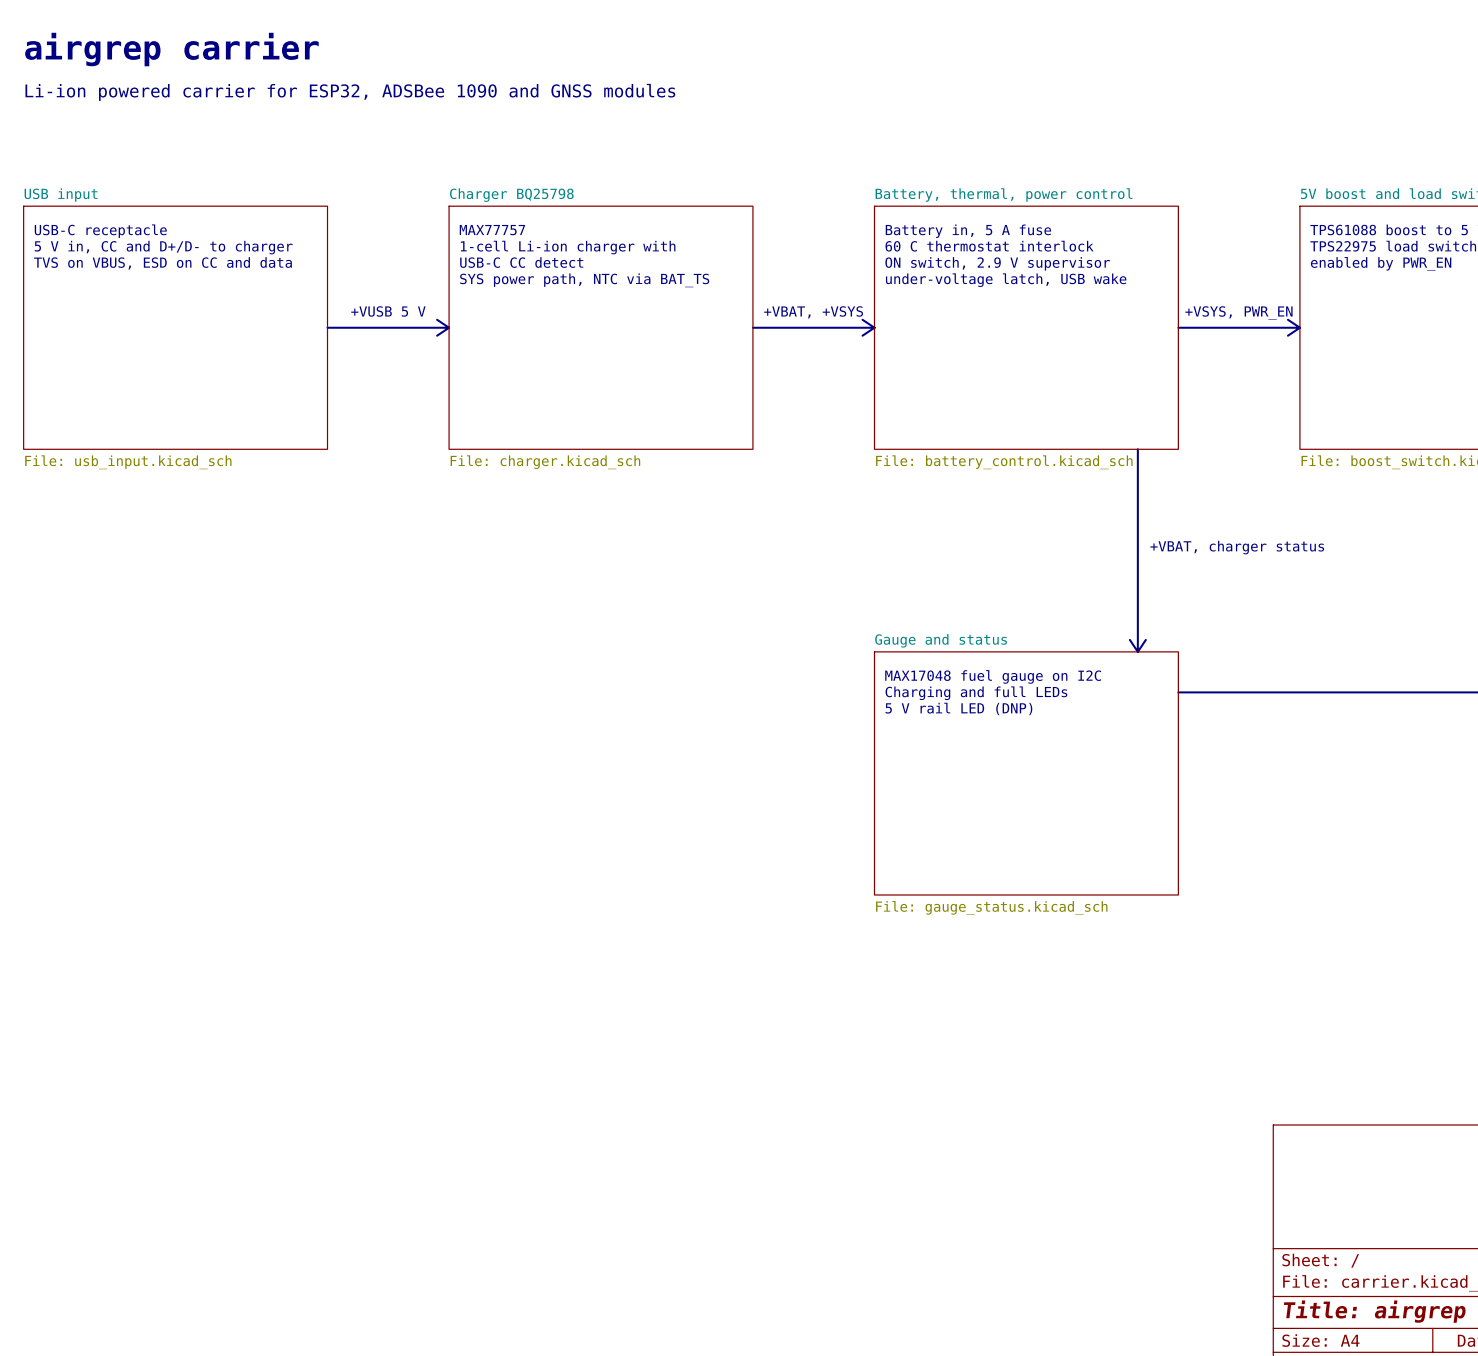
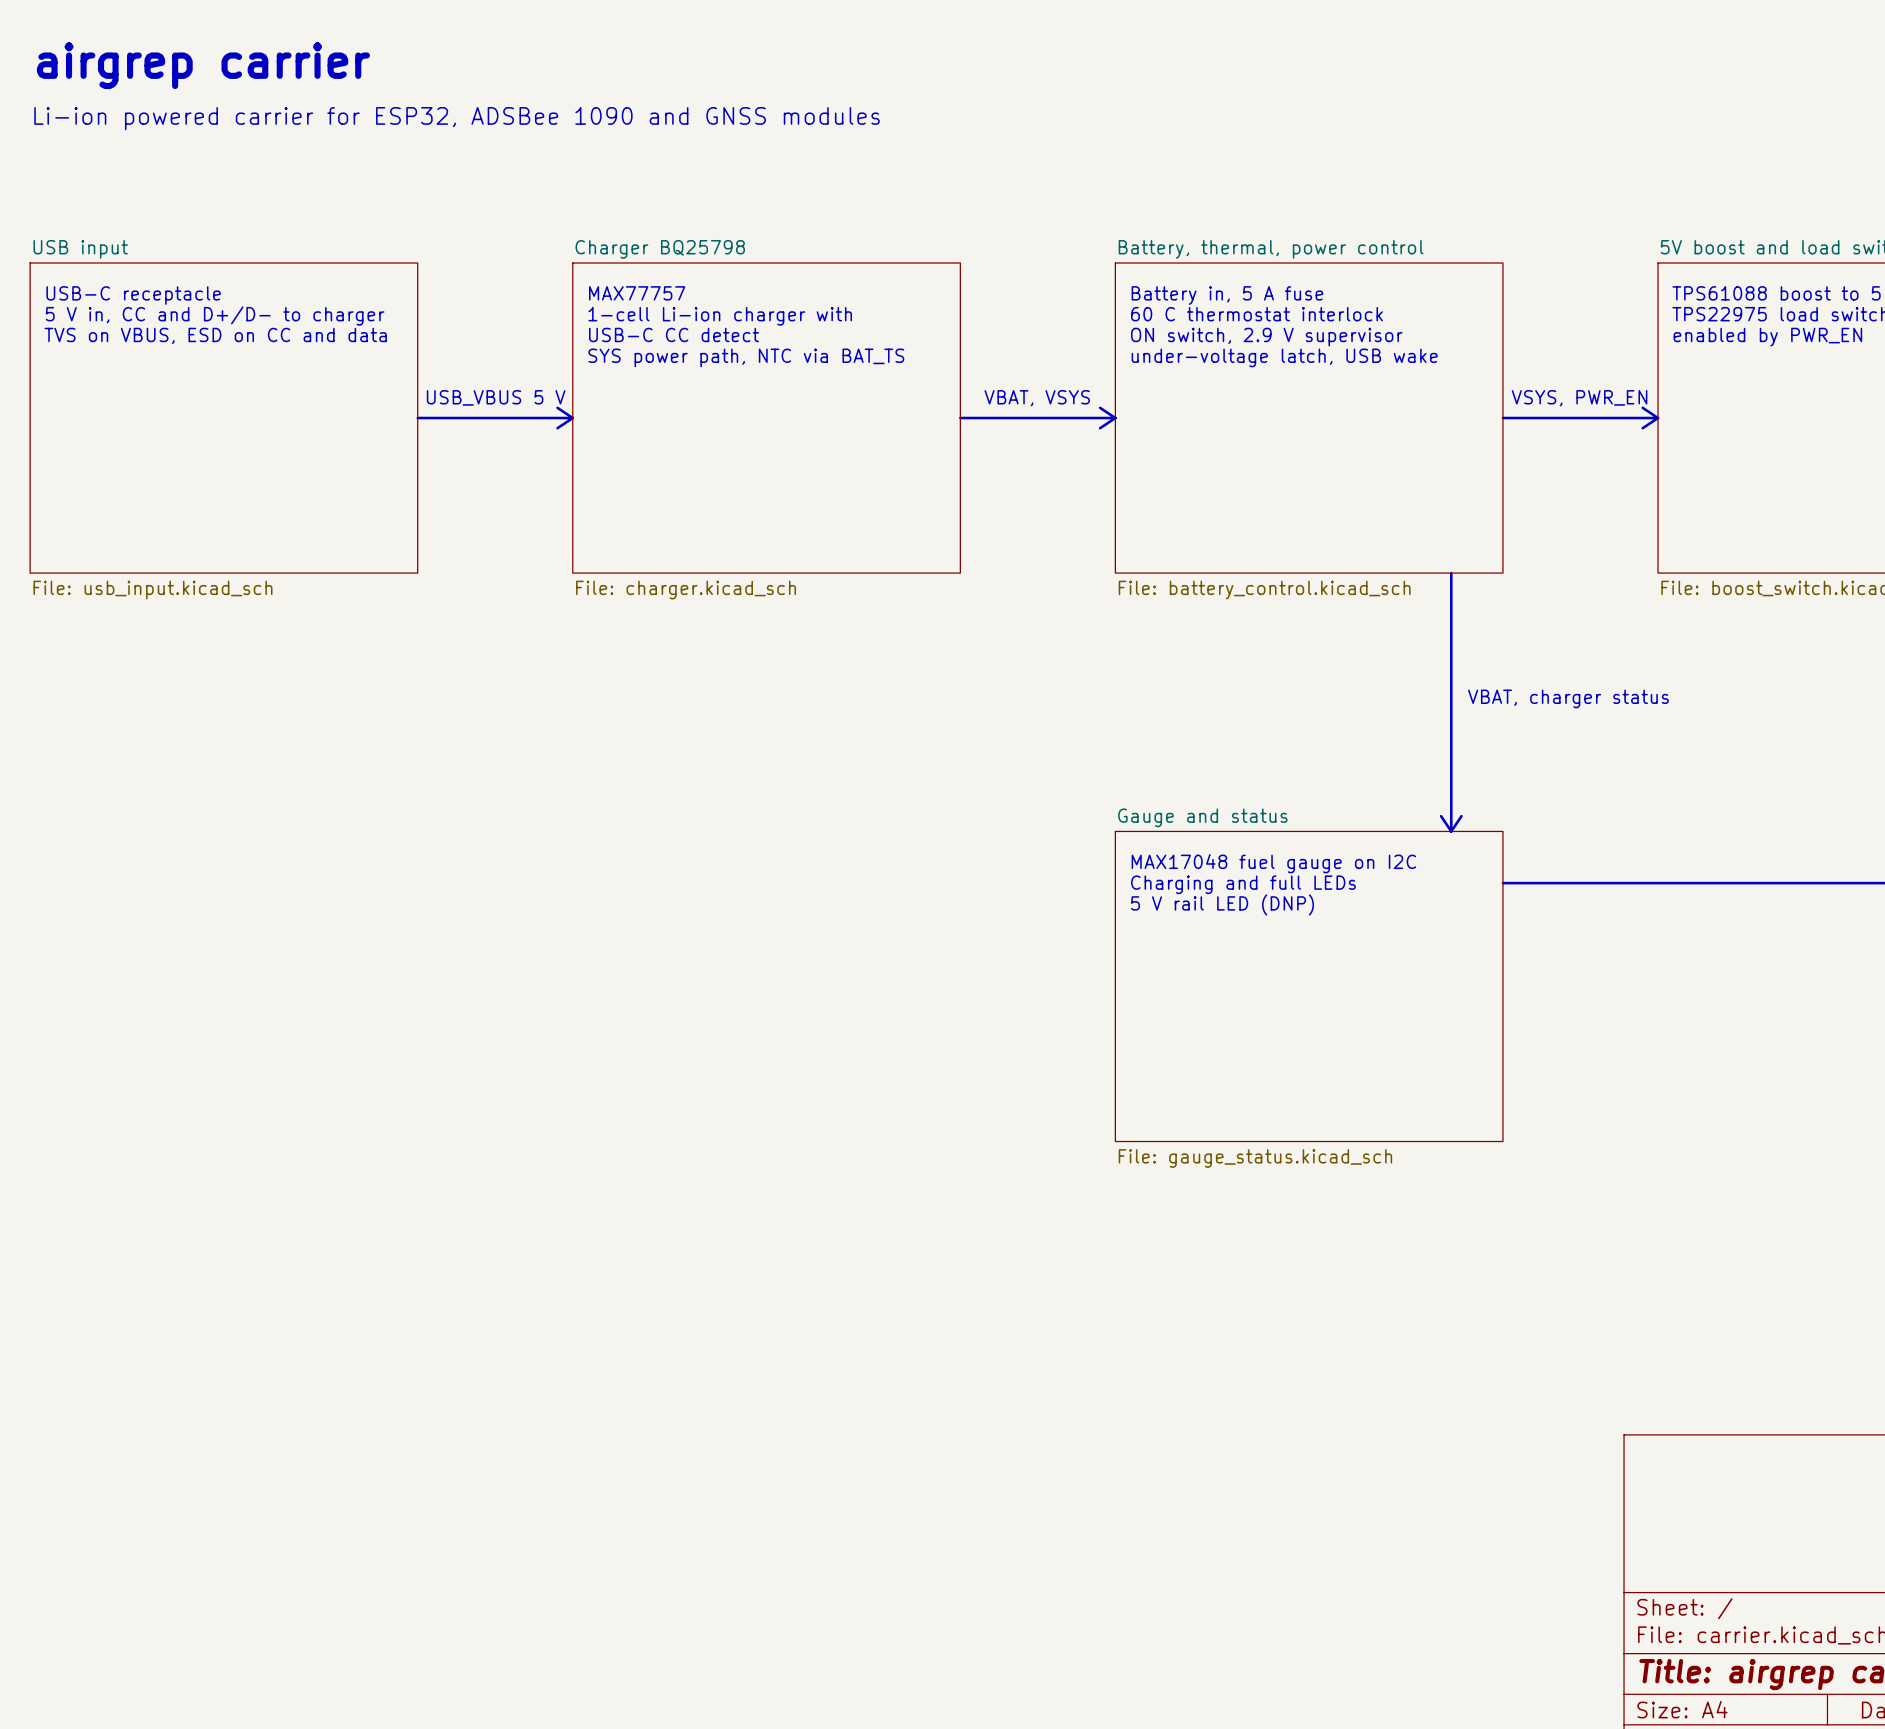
text: +VUSB 5 V (388, 311) -> USB_VBUS 5 V (496, 397)
text: +VBAT, +VSYS (813, 312) -> VBAT, VSYS (1037, 398)
text: +VSYS, PWR_EN (1238, 313) -> VSYS, PWR_EN (1579, 398)
text: +VBAT, charger status (1237, 547) -> VBAT, charger status (1568, 698)

